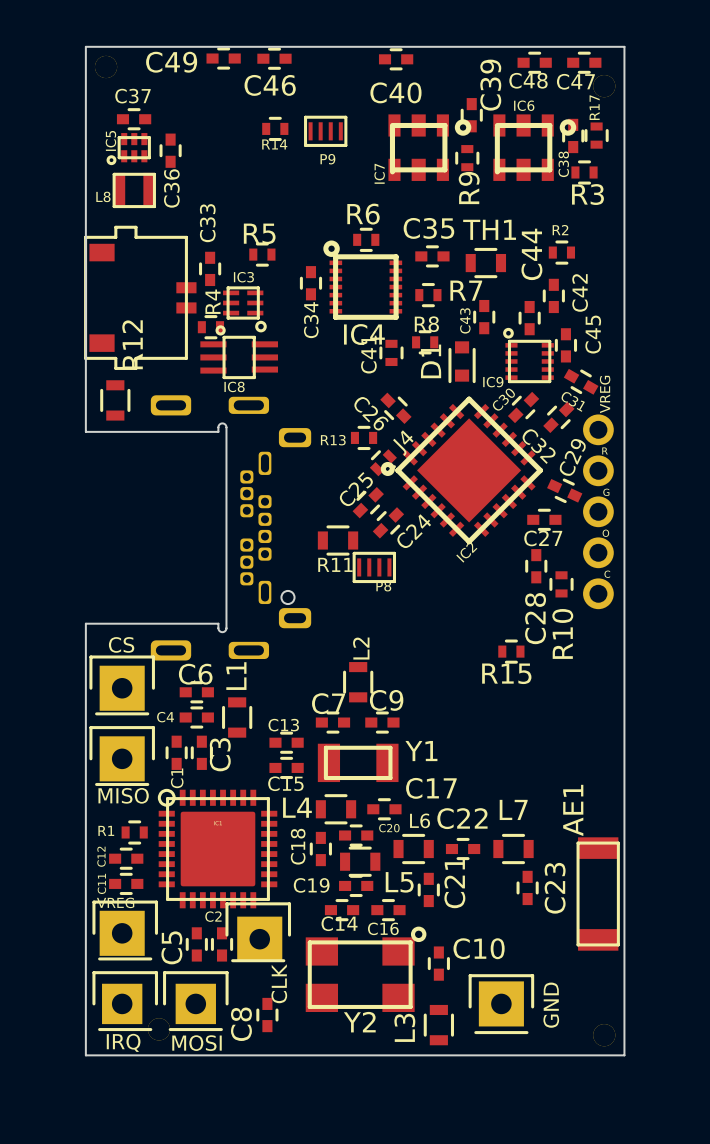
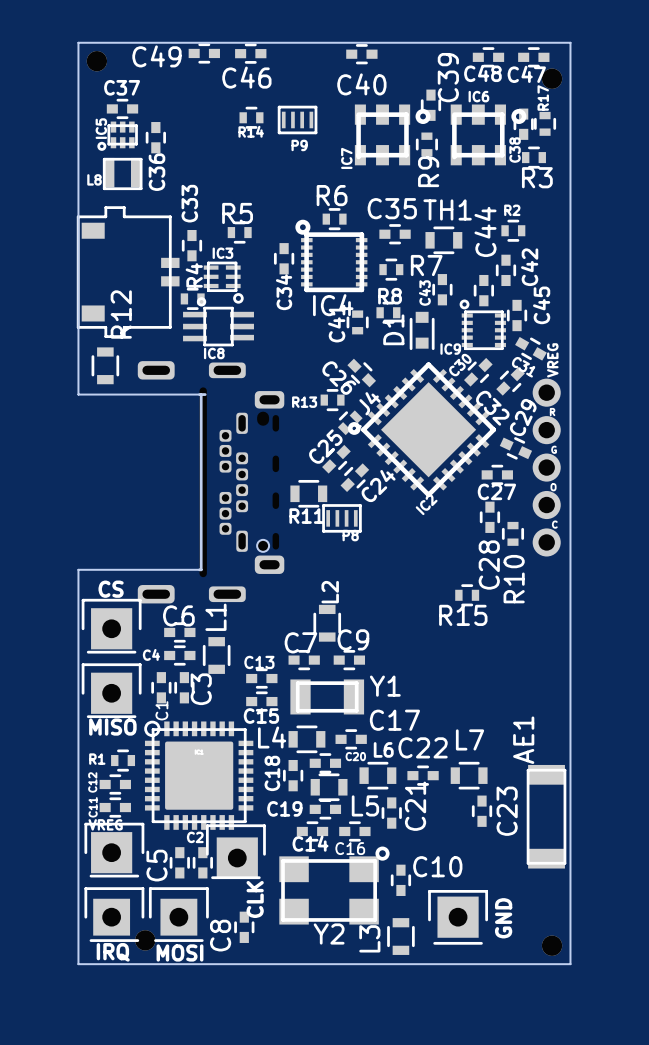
part footprint: [150, 395, 312, 661] -> [137, 361, 285, 604]
board edge: (218, 431) (219, 424) (225, 424) (226, 628) -> (199, 394) (205, 394)
board edge: (218, 623) (220, 631) (224, 631) (226, 628) -> (199, 569) (201, 569) (201, 394)

